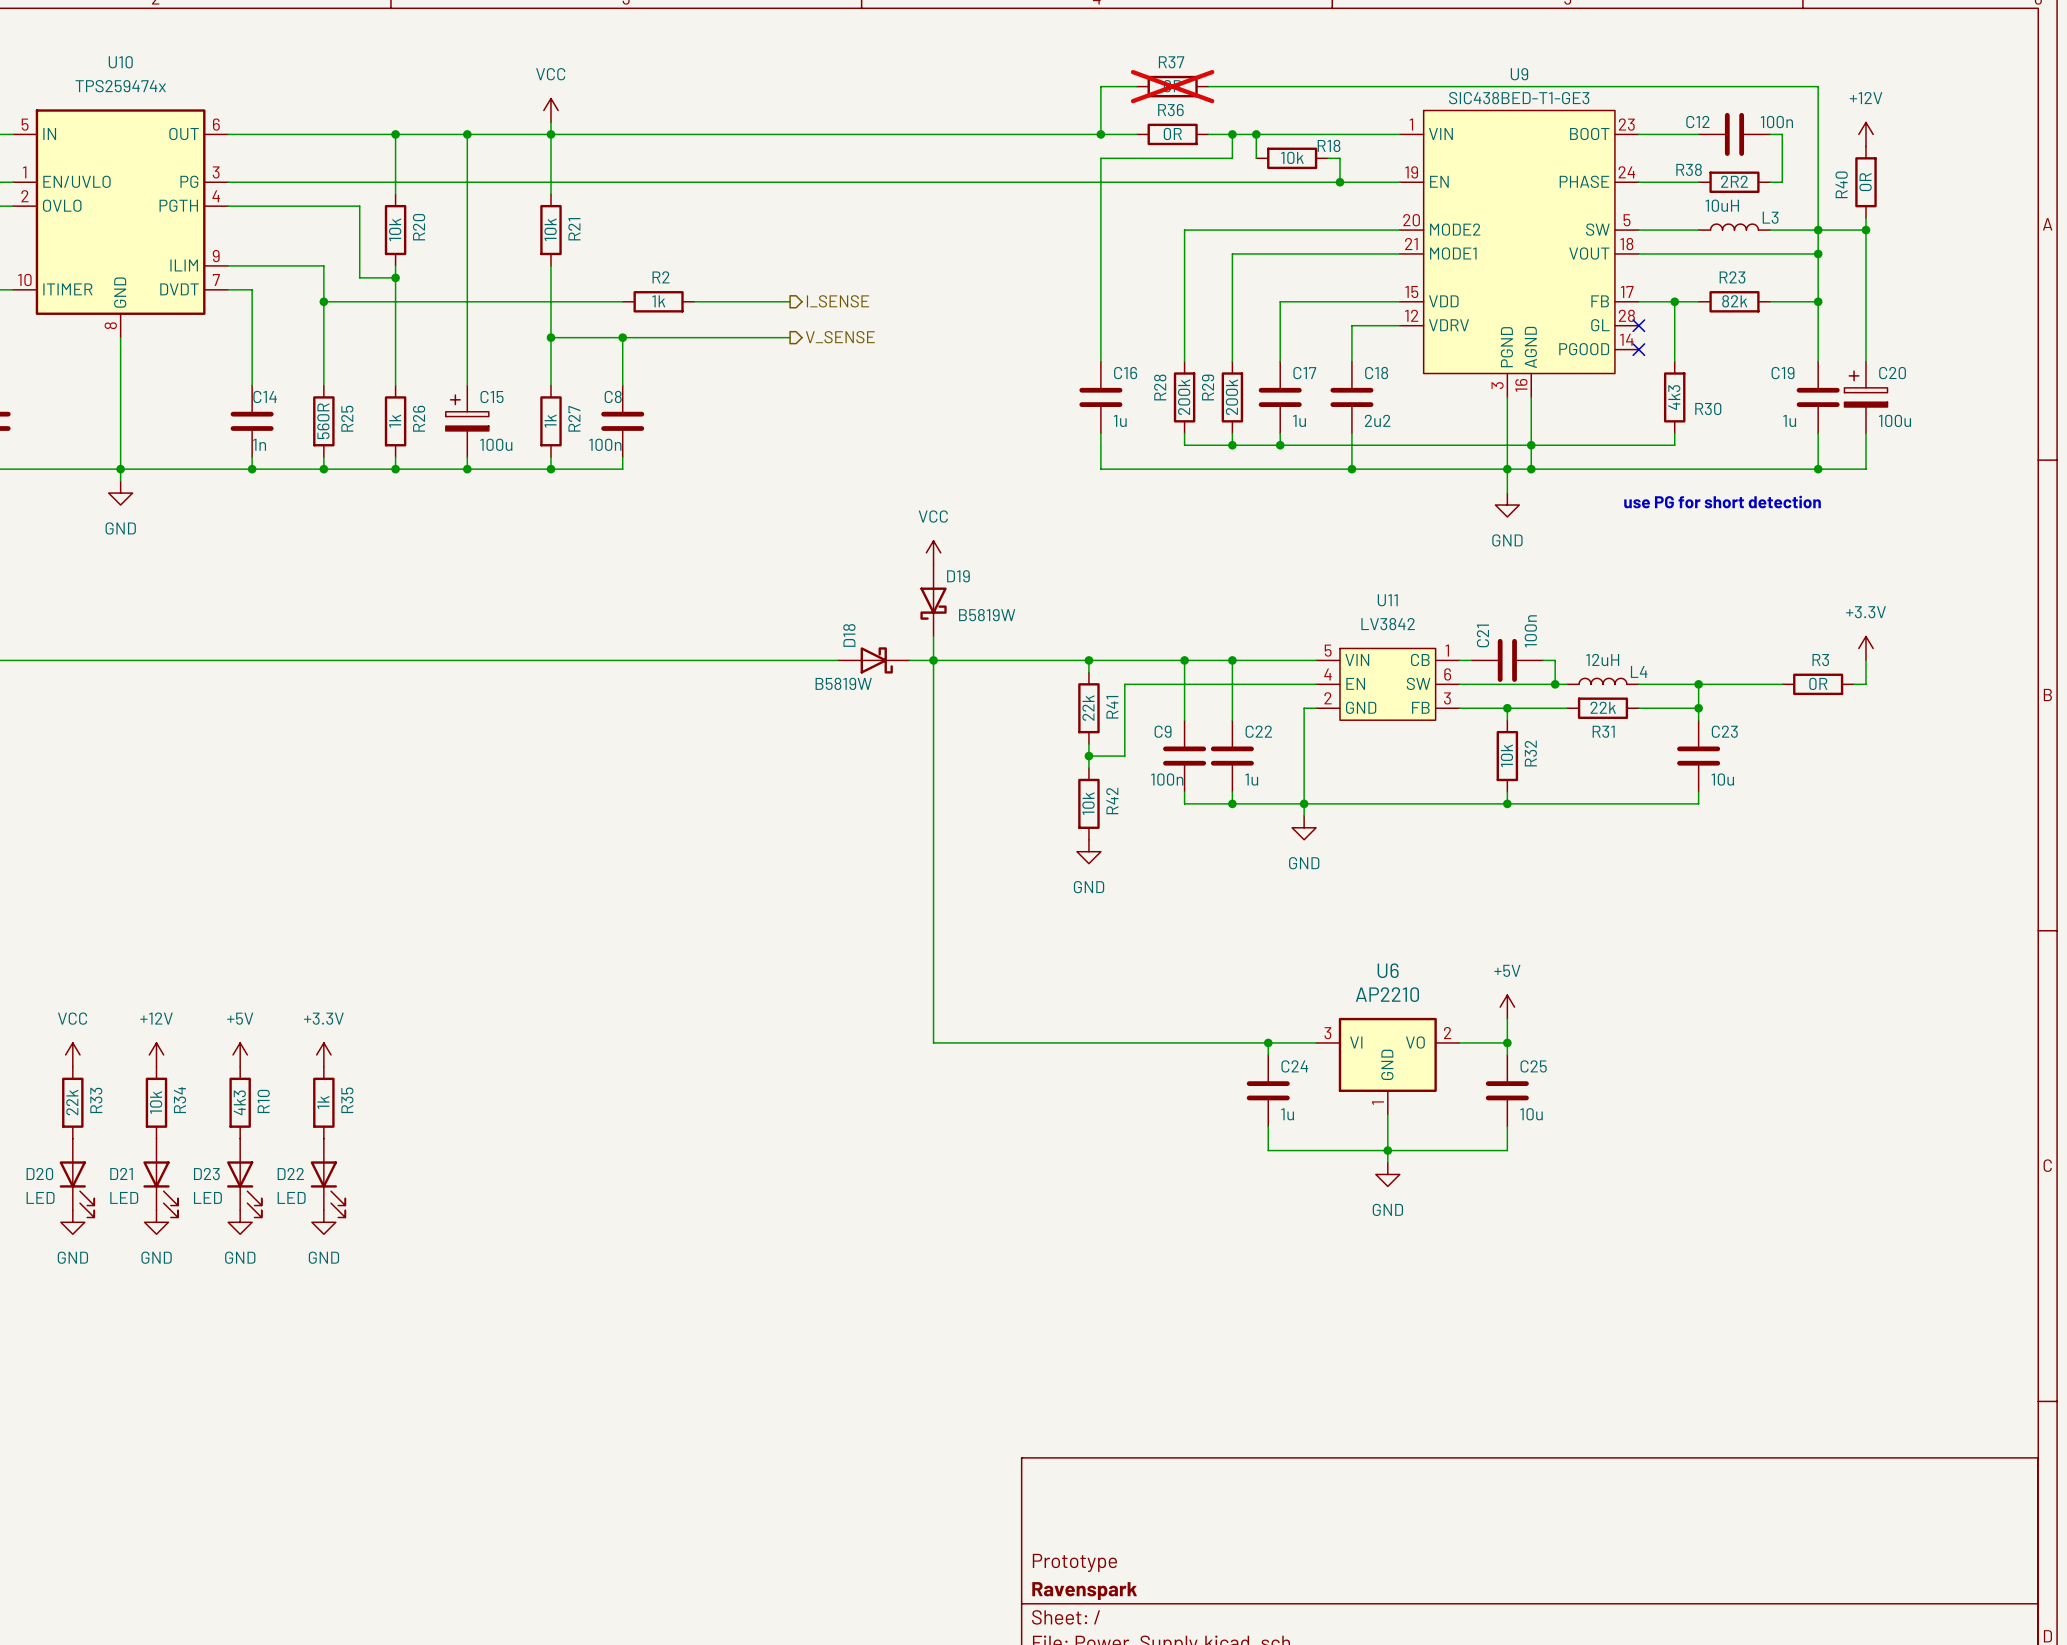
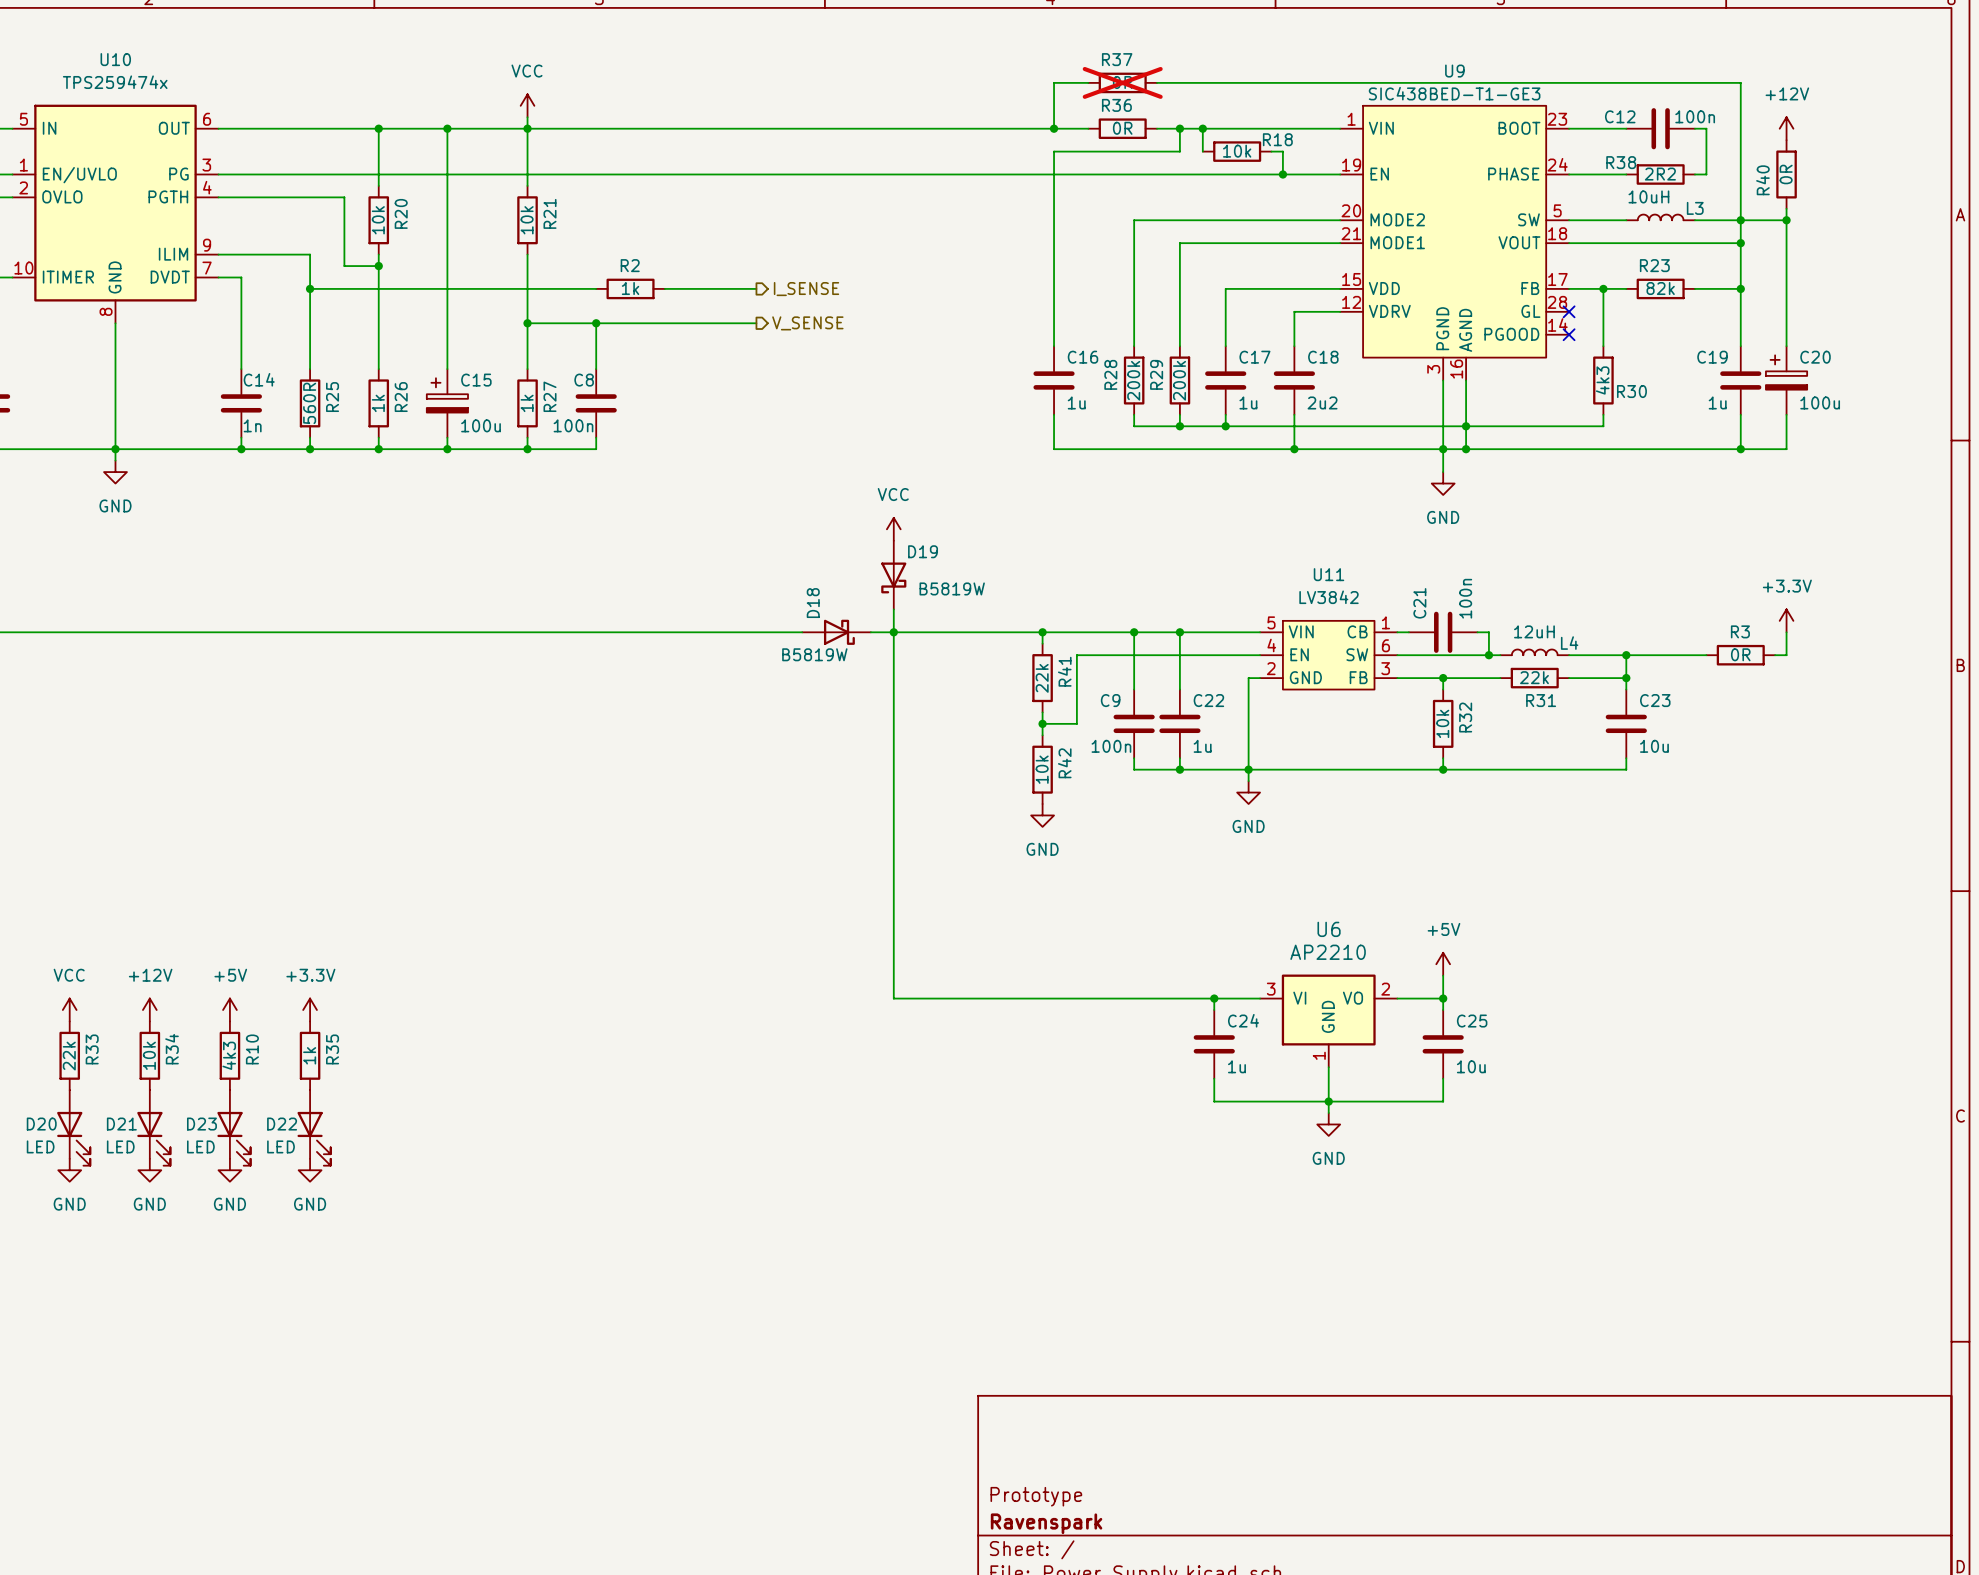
text: use PG for short detection (1722, 502) -> none

